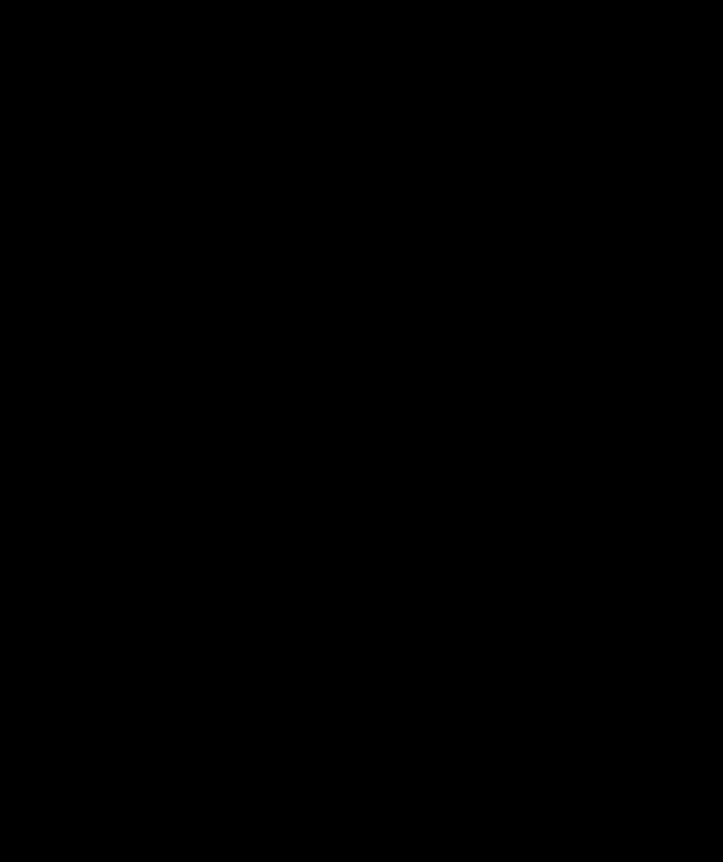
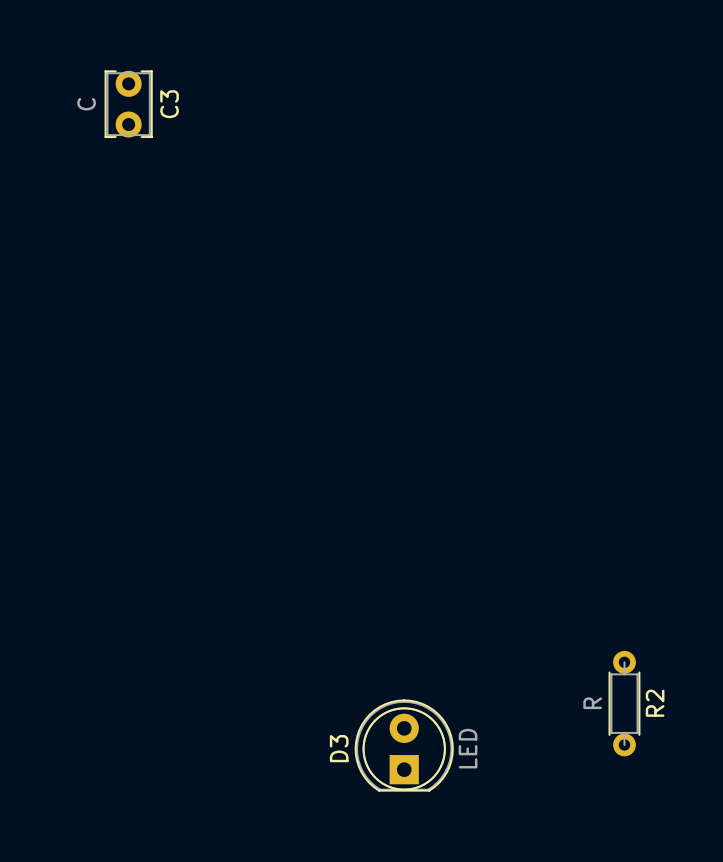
C3: none -> C (128, 104)
R2: none -> R (624, 703)
D3: none -> LED (404, 745)

